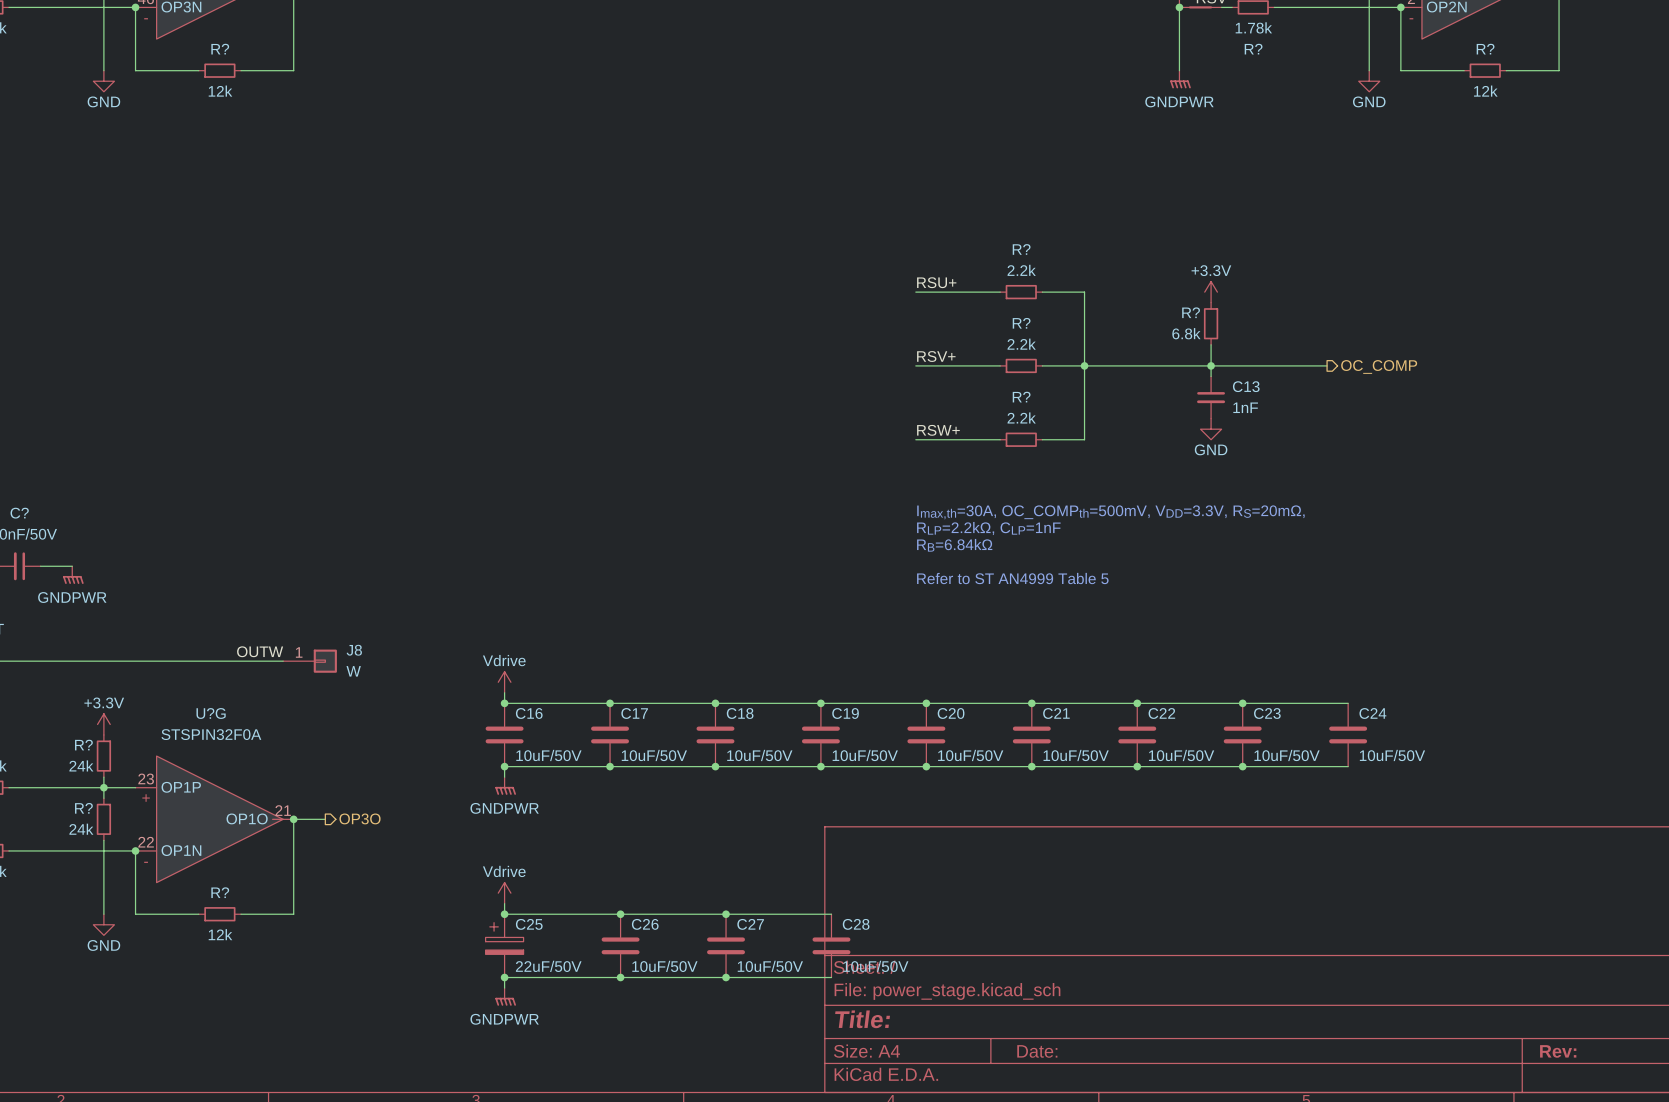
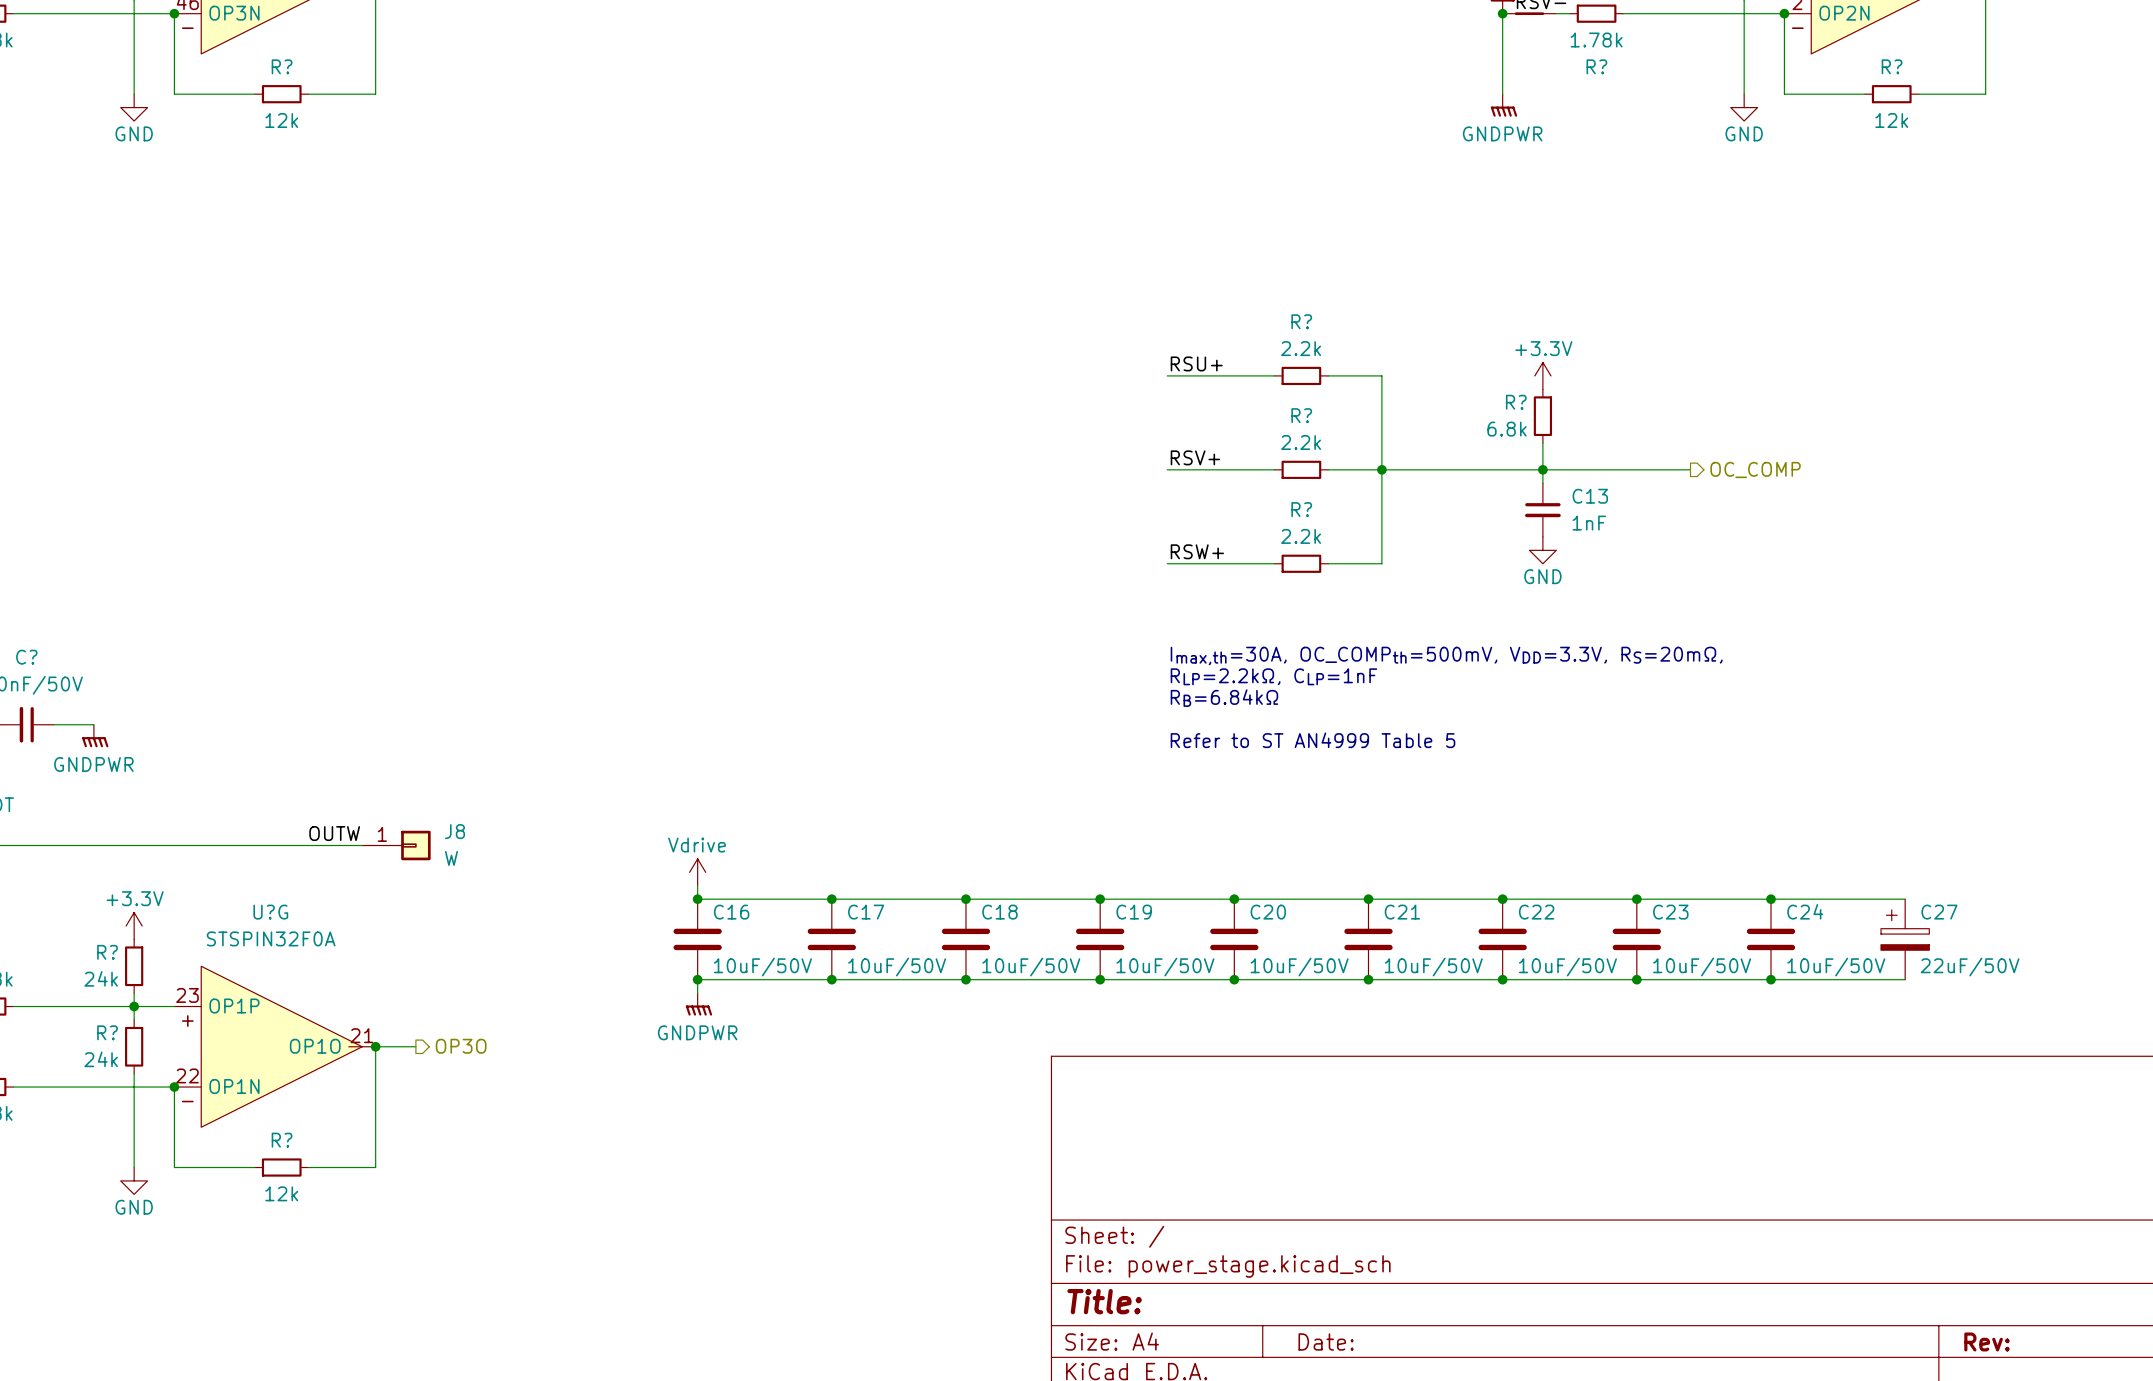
power symbol position: Vdrive (504, 682) -> Vdrive (697, 872)
wire: (504, 692) (504, 703) (546, 703) -> (697, 885) (697, 899)
junction: (504, 703) -> none
junction: none -> (697, 899)
junction: (610, 703) -> none
junction: none -> (831, 899)
junction: (715, 703) -> none
junction: none -> (965, 899)
junction: (820, 703) -> none
junction: none -> (1100, 899)
junction: (926, 703) -> none
junction: none -> (1234, 899)
junction: (1031, 703) -> none
junction: none -> (1368, 899)
junction: (1137, 703) -> none
junction: none -> (1502, 899)
junction: (1242, 703) -> none
junction: none -> (1636, 899)
wire: none -> (1717, 899) (1905, 899)
junction: none -> (1770, 899)
C16 position: (504, 734) -> (697, 939)
C17 position: (610, 734) -> (831, 939)
C18 position: (715, 734) -> (965, 939)
C19 position: (820, 734) -> (1100, 939)
C20 position: (926, 734) -> (1234, 939)
C21 position: (1031, 734) -> (1368, 939)
C22 position: (1137, 734) -> (1502, 939)
C23 position: (1242, 734) -> (1636, 939)
C24 position: (1348, 734) -> (1770, 939)
junction: (504, 766) -> none
wire: (546, 766) (504, 766) (504, 777) -> (697, 979) (697, 993)
junction: none -> (697, 979)
junction: (610, 766) -> none
junction: none -> (831, 979)
junction: (715, 766) -> none
junction: none -> (965, 979)
junction: (820, 766) -> none
junction: none -> (1100, 979)
junction: (926, 766) -> none
junction: none -> (1234, 979)
junction: (1031, 766) -> none
junction: none -> (1368, 979)
junction: (1137, 766) -> none
junction: none -> (1502, 979)
junction: (1242, 766) -> none
junction: none -> (1636, 979)
wire: none -> (1717, 979) (1905, 979)
junction: none -> (1770, 979)
power symbol position: GNDPWR (505, 786) -> GNDPWR (698, 1004)
power symbol: Vdrive (504, 893) -> none
wire: (504, 903) (504, 914) (831, 914) -> none
junction: (504, 914) -> none
junction: (620, 914) -> none
C27 symbol: [707, 914, 746, 978] -> [1881, 899, 1930, 980]
junction: (726, 914) -> none
C25: 22uF/50V (504, 945) -> none
C26: 10uF/50V (620, 945) -> none
C28: 10uF/50V (831, 945) -> none
C27 value: 10uF/50V (770, 966) -> 22uF/50V (1970, 967)
junction: (504, 977) -> none
junction: (620, 977) -> none
junction: (726, 977) -> none
wire: (831, 977) (504, 977) (504, 988) -> none
power symbol: GNDPWR (505, 996) -> none

